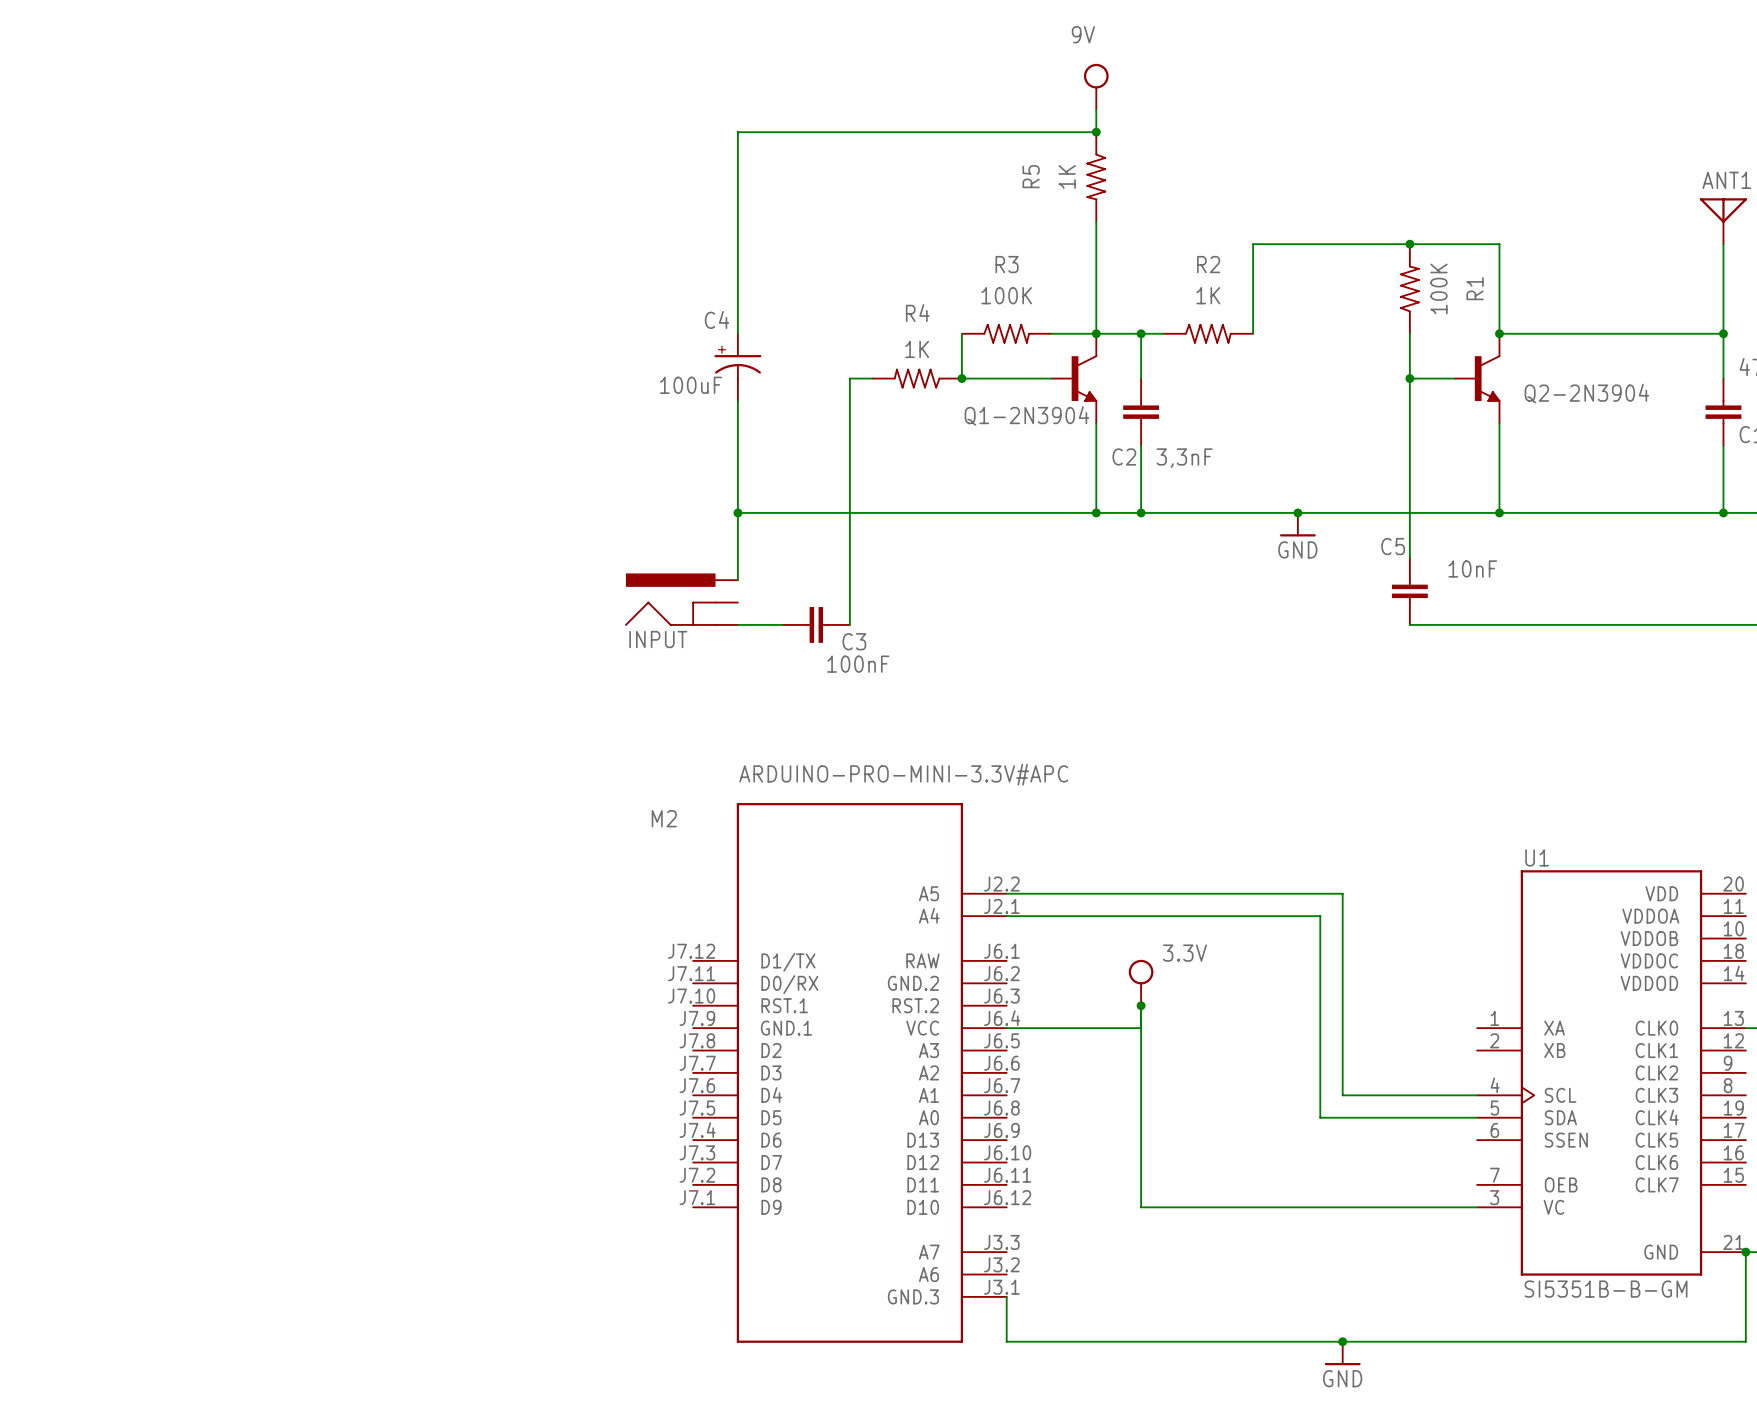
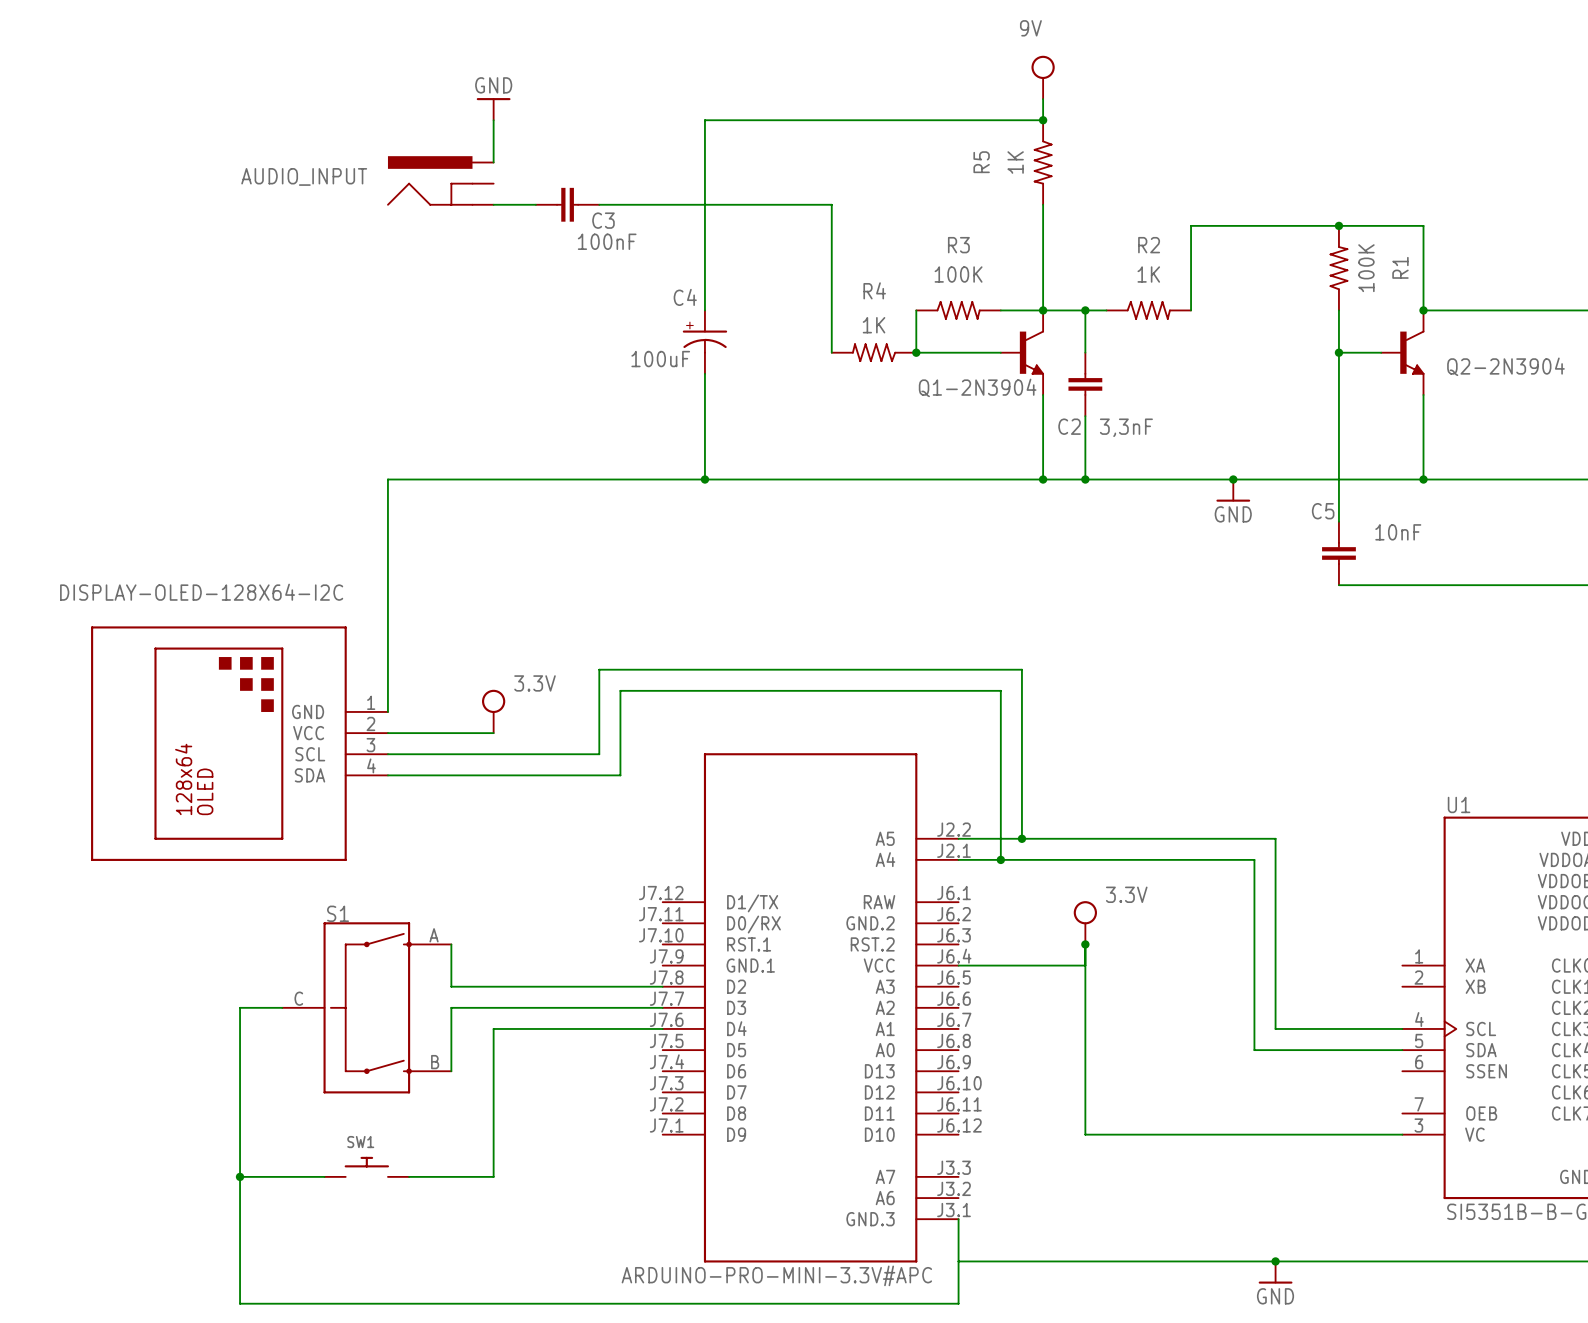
power symbol: none -> GND (493, 109)
wire: none -> (493, 120) (493, 162)
AUDIO_INPUT: none -> (440, 180)
wire: none -> (493, 204) (535, 204)
wire: (872, 378) (849, 378) (849, 624) -> (831, 352) (831, 204) (599, 204)
wire: (737, 512) (737, 580) -> (704, 479) (387, 479) (387, 711)
INPUT: (681, 599) -> none
wire: (737, 624) (782, 624) -> none
C3 position: (816, 624) -> (567, 204)
power symbol: none -> (493, 711)
M2 value position: ARDUINO-PRO-MINI-3.3V#APC (903, 774) -> ARDUINO-PRO-MINI-3.3V#APC (776, 1275)
wire: none -> (387, 733) (493, 733)
part: none -> DISPLAY-OLED-128X64-I2C (239, 743)
wire: none -> (387, 754) (599, 754) (599, 669) (1021, 669) (1021, 838)
M2 name: M2 (664, 818) -> none
wire: none -> (387, 775) (620, 775) (620, 690) (1000, 690) (1000, 859)
junction: none -> (1021, 838)
junction: none -> (1000, 859)
wire: none -> (451, 944) (451, 986) (662, 986)
wire: none -> (282, 1007) (240, 1007) (240, 1303) (958, 1303) (958, 1261)
S1: none -> (366, 1007)
wire: none -> (662, 1007) (451, 1007) (451, 1071)
wire: none -> (662, 1028) (493, 1028) (493, 1176) (409, 1176)
SW1: none -> (366, 1166)
wire: none -> (240, 1176) (324, 1176)
junction: none -> (240, 1176)

